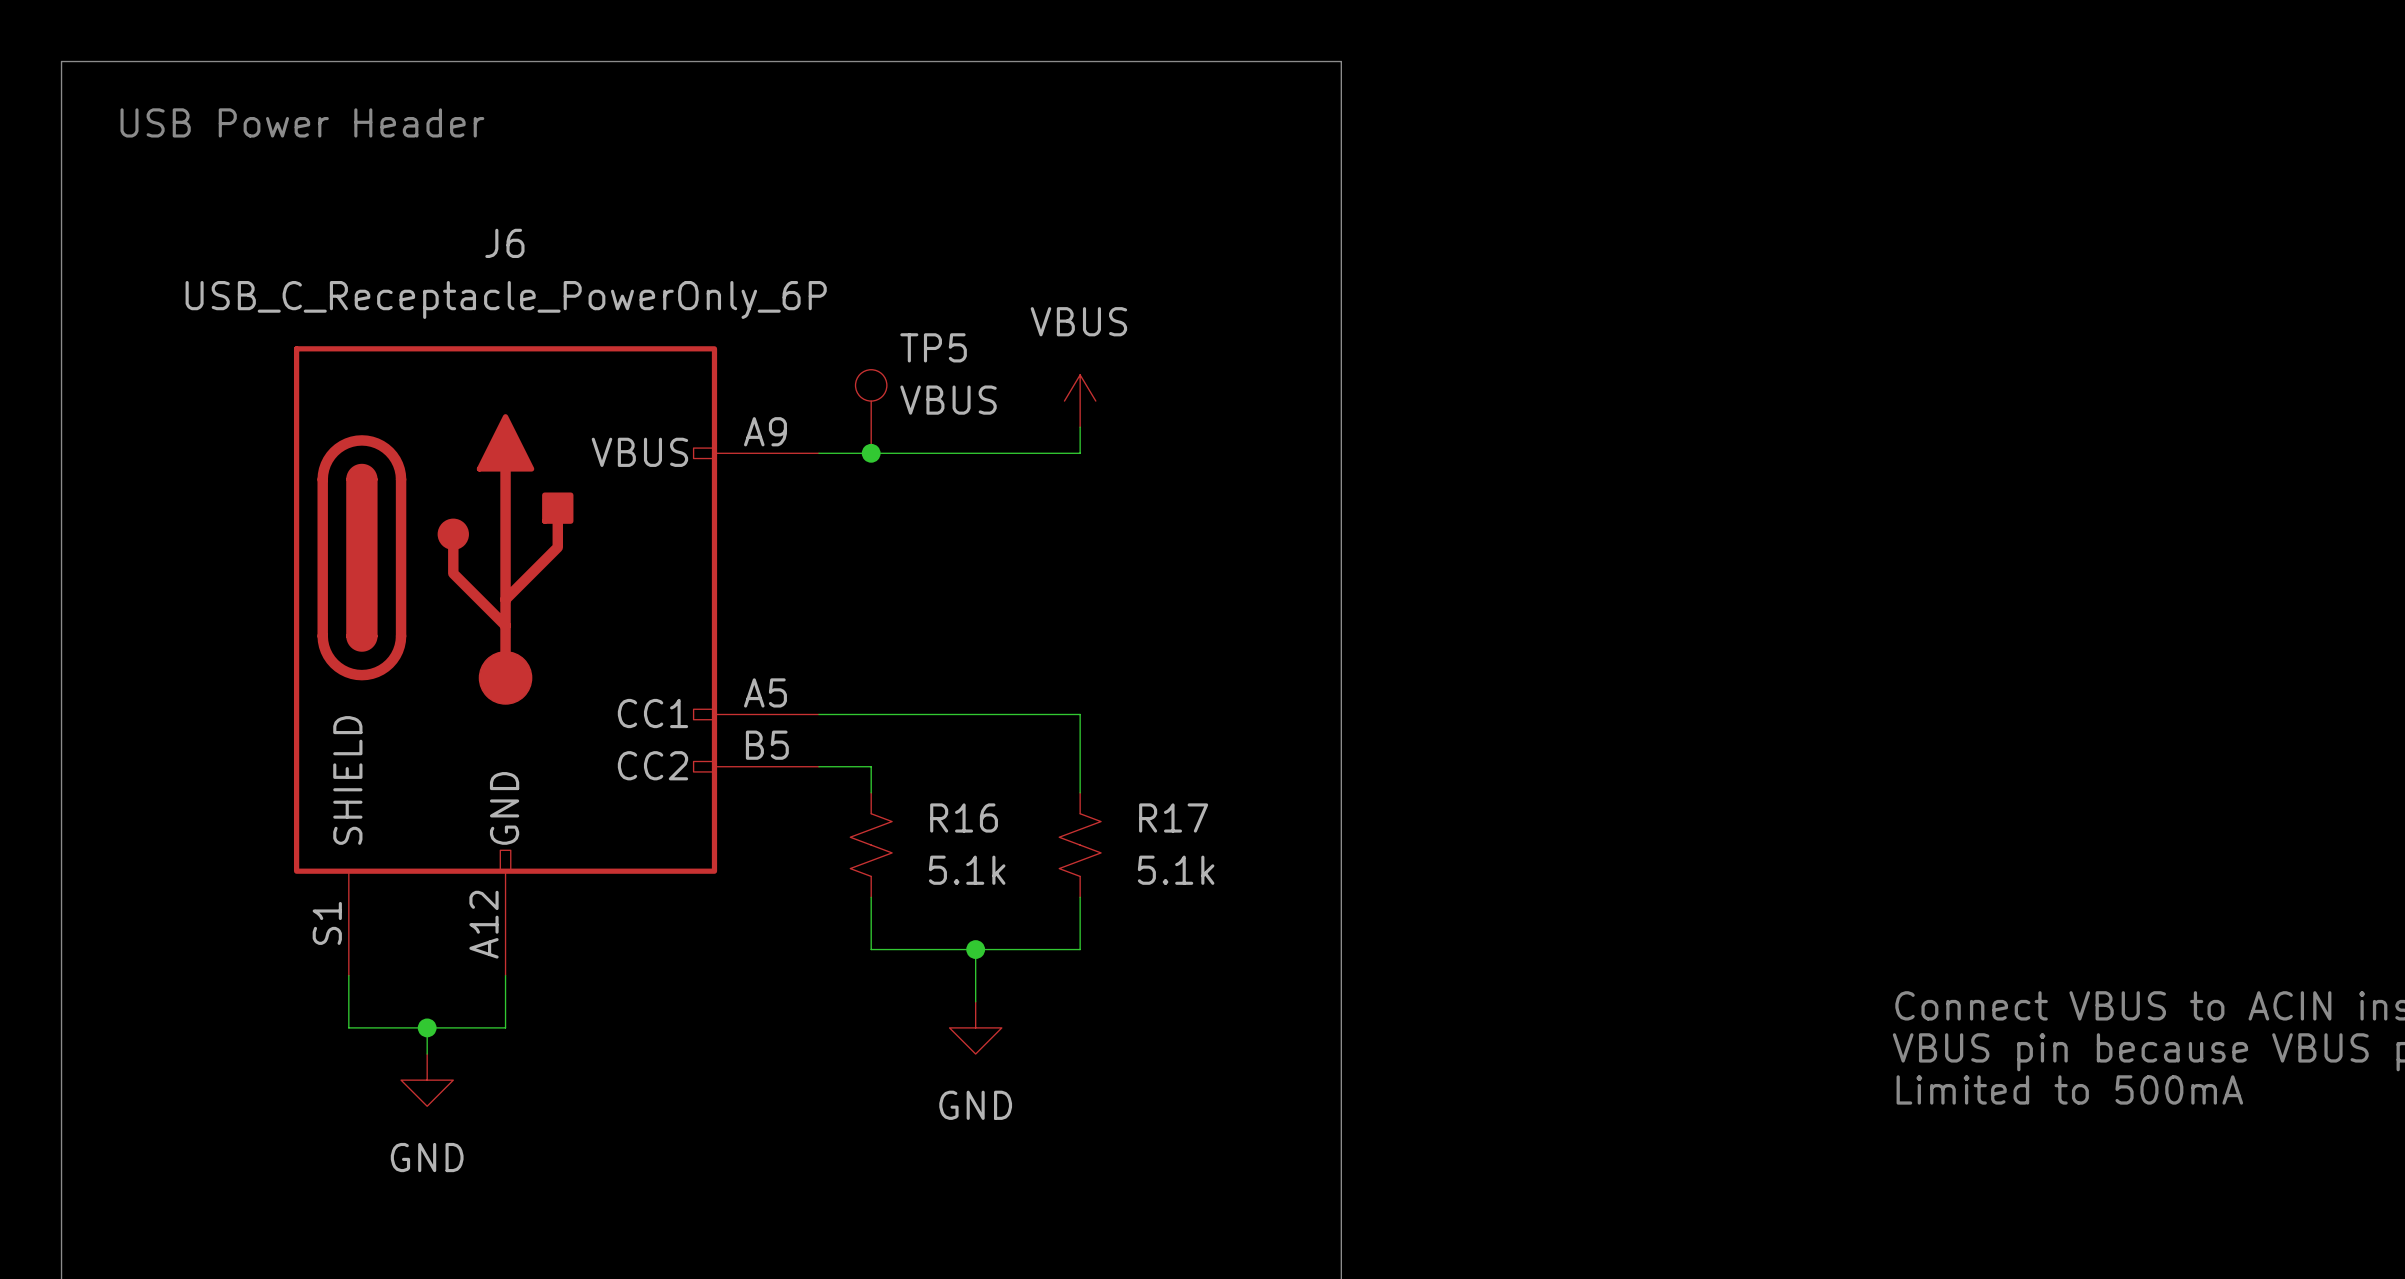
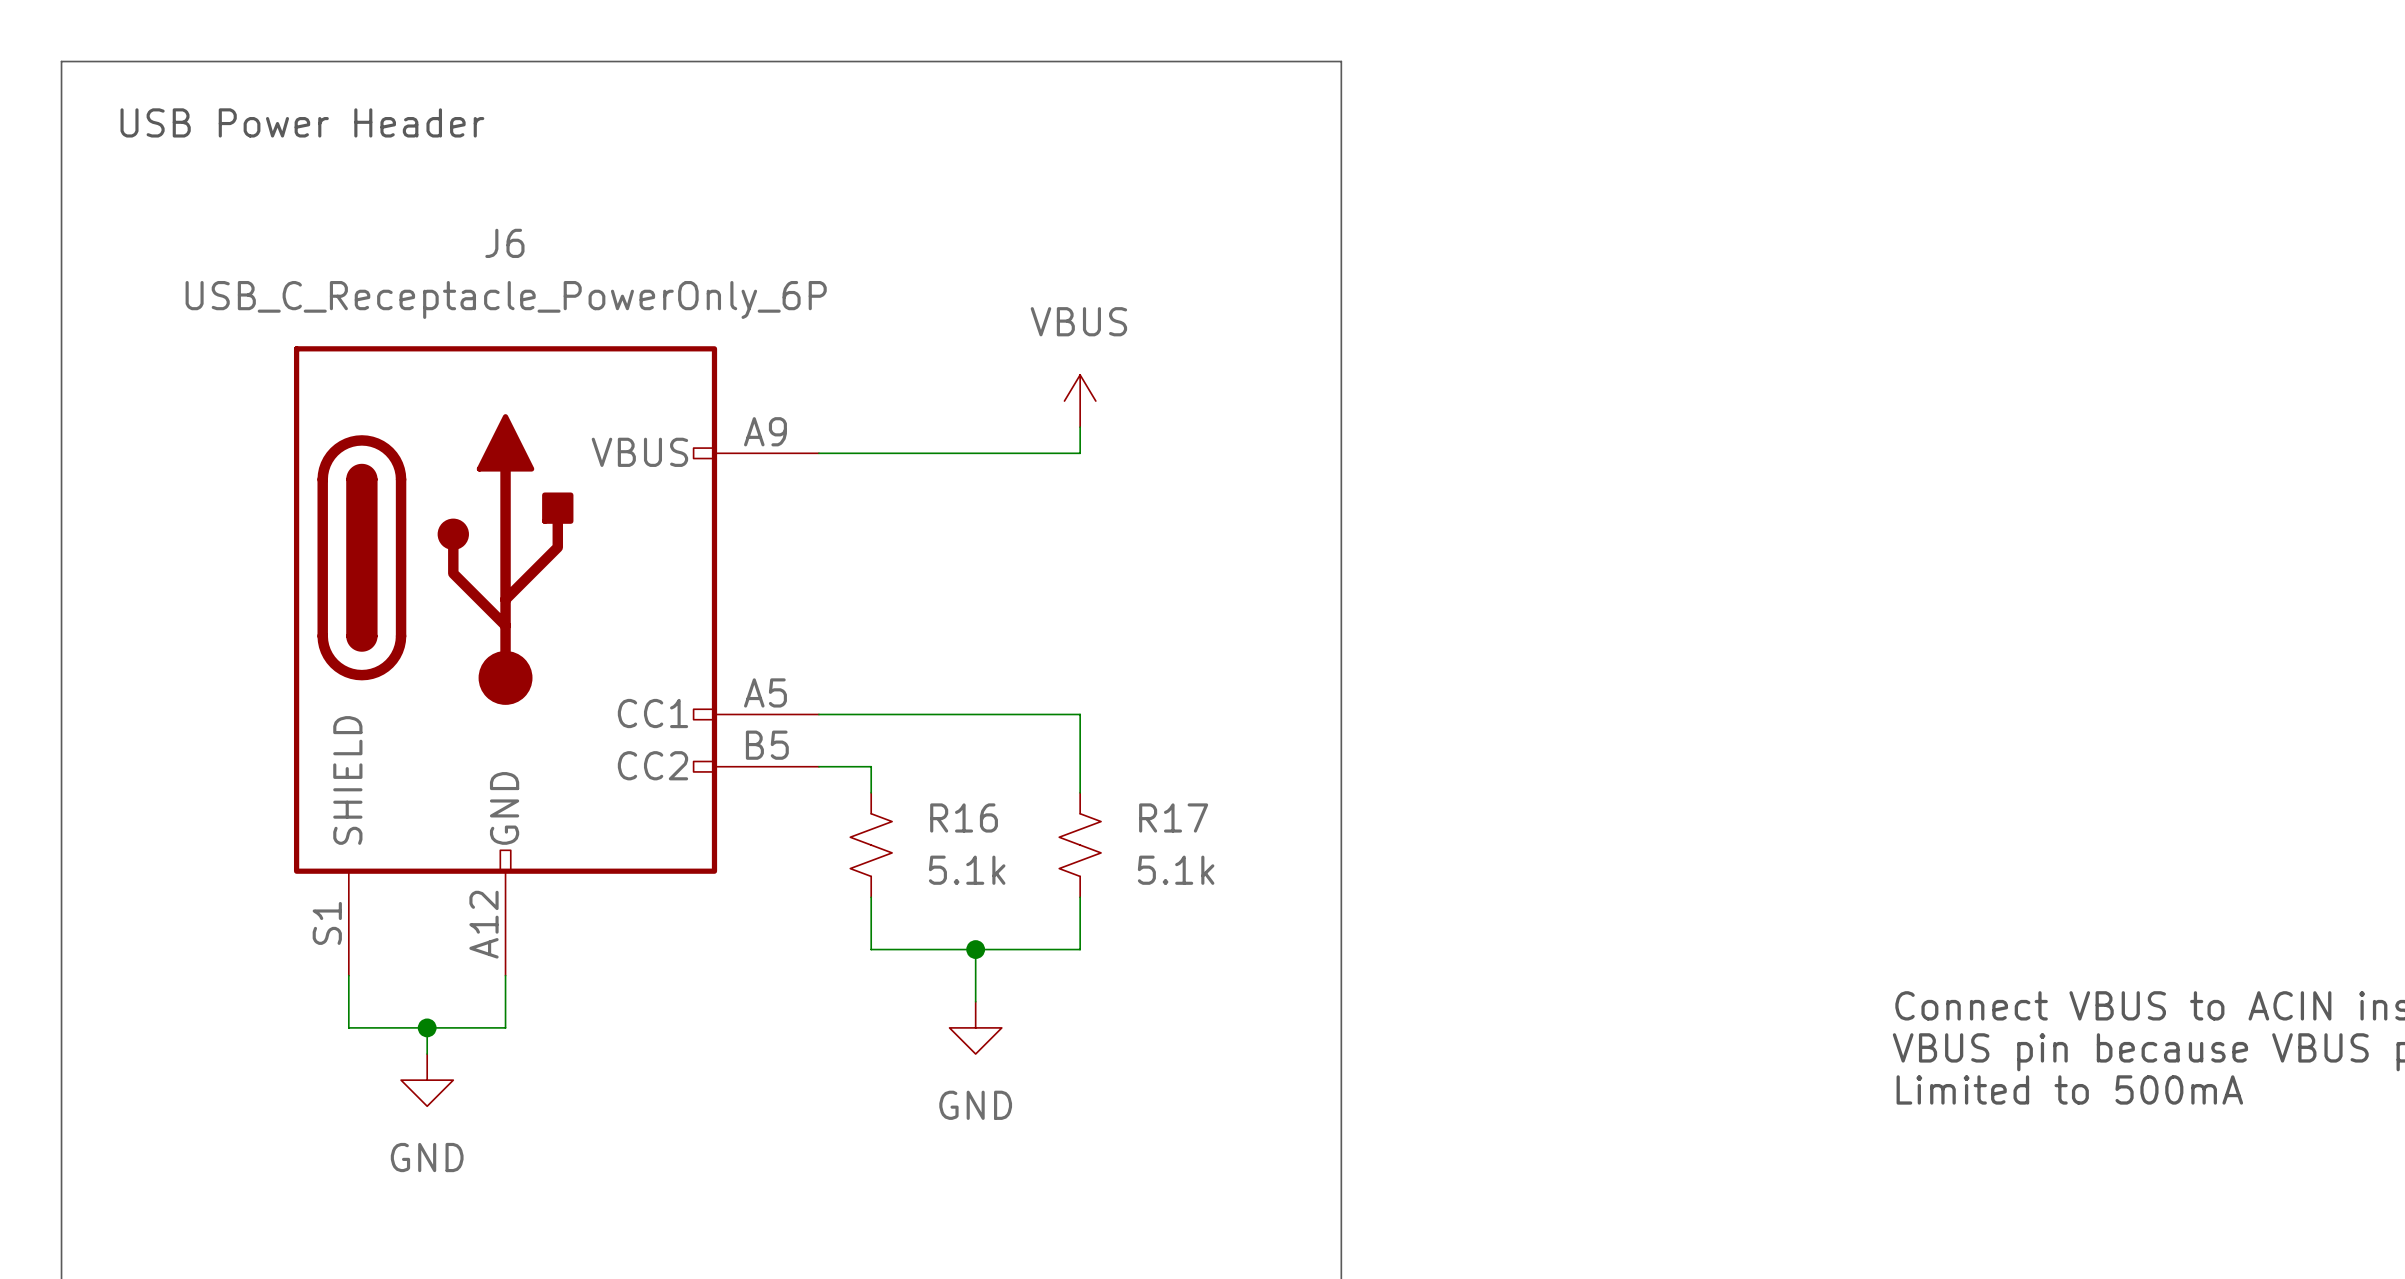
TP5: VBUS (871, 411) -> none
junction: (871, 453) -> none

